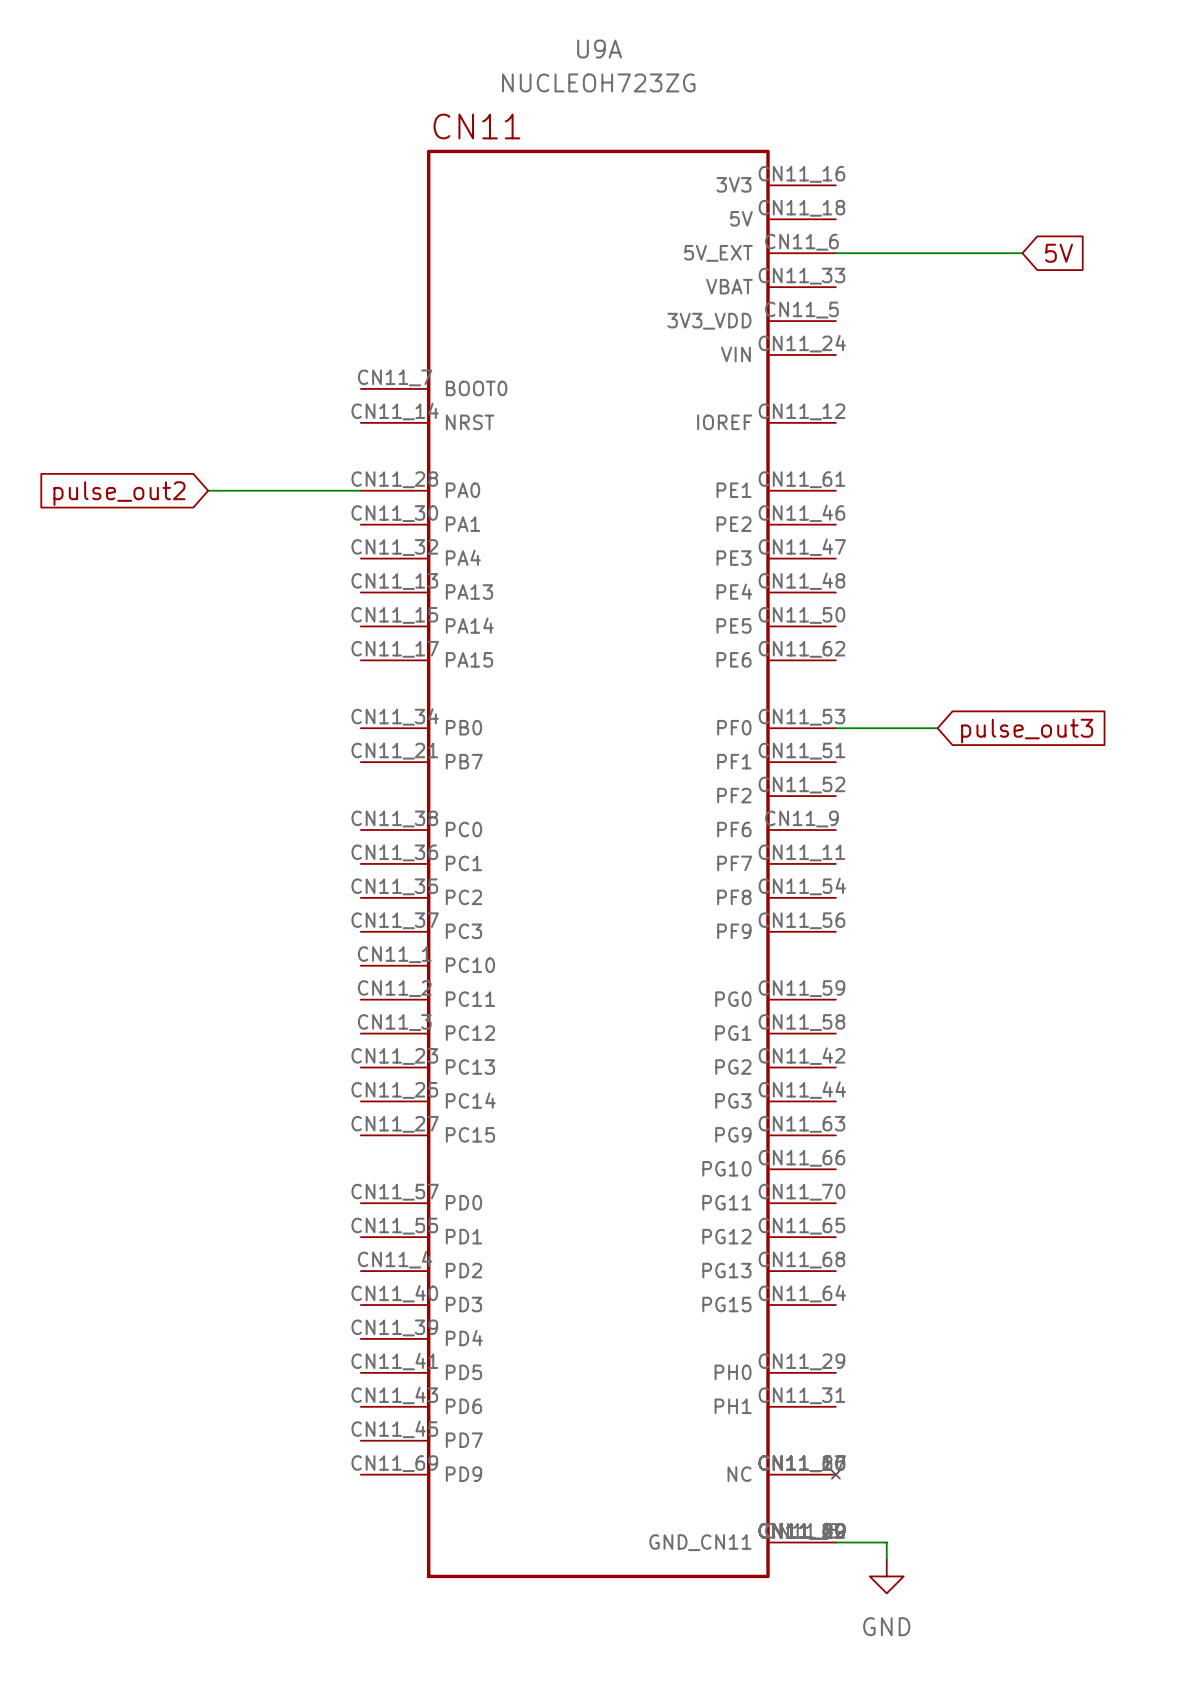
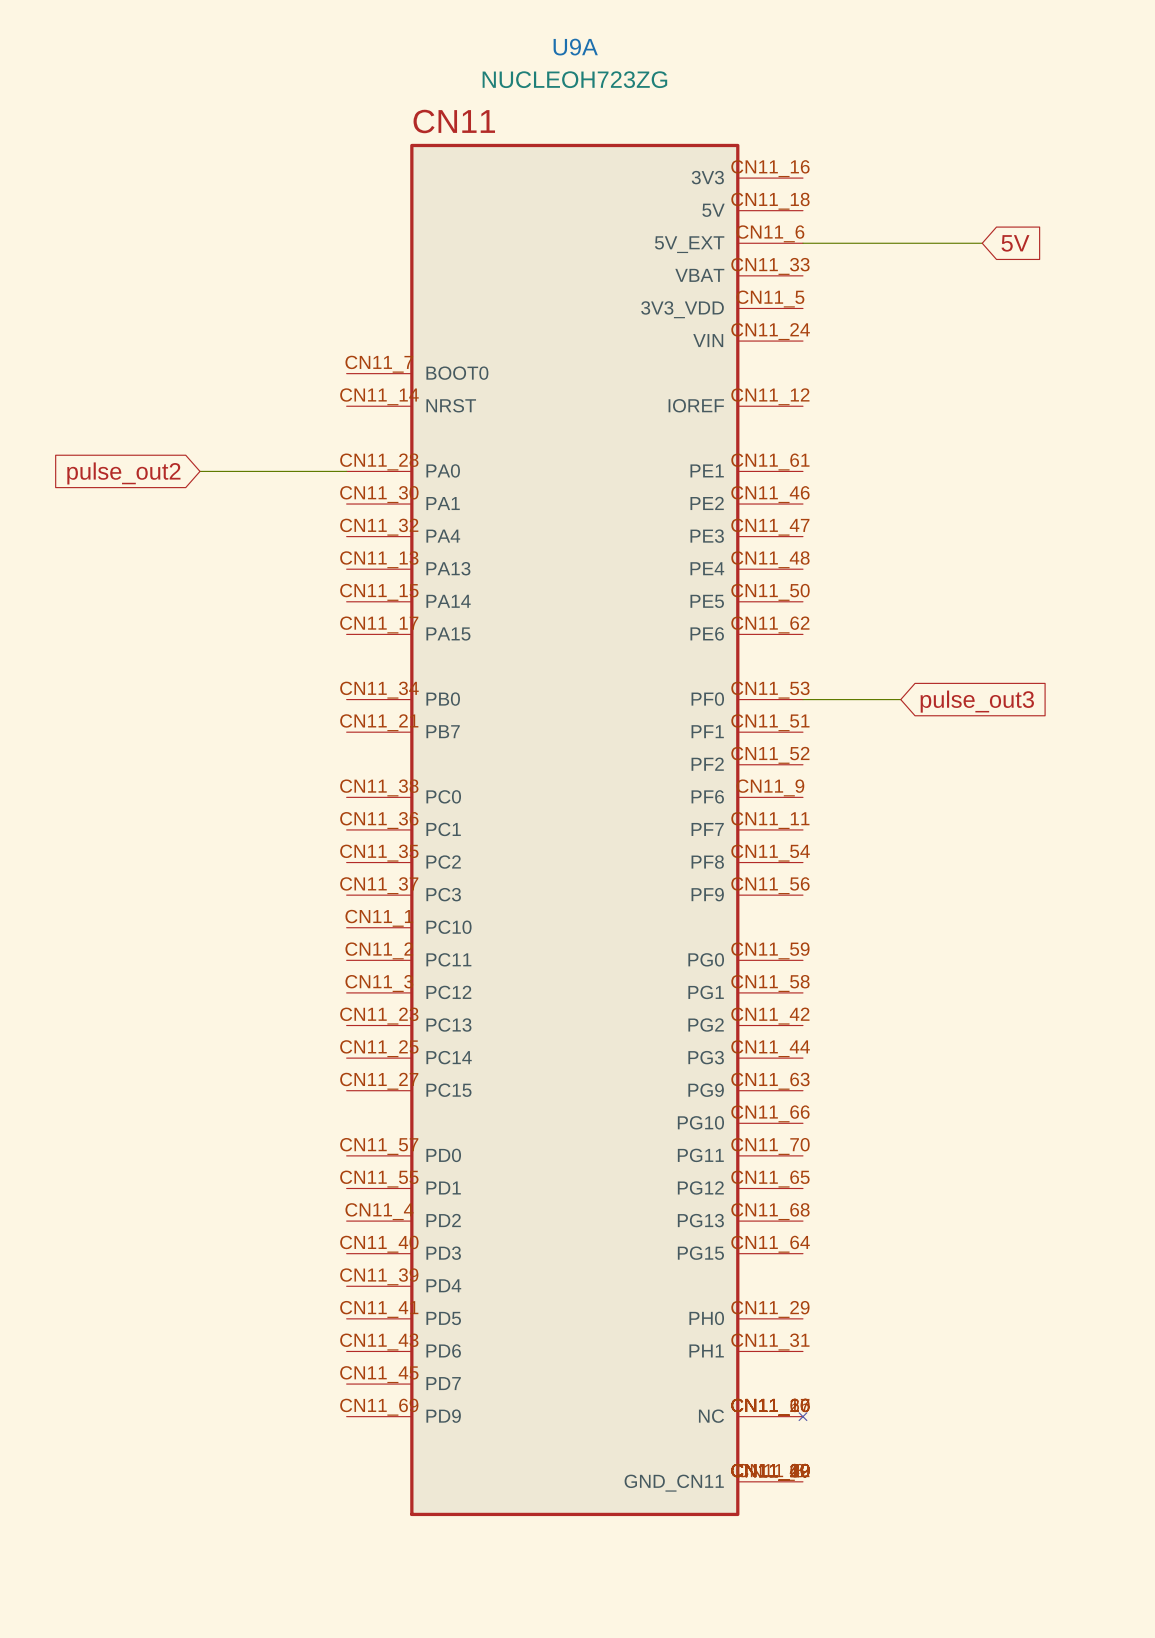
wire: (835, 1542) (886, 1542) (886, 1559) -> none
power symbol: GND (886, 1576) -> none

